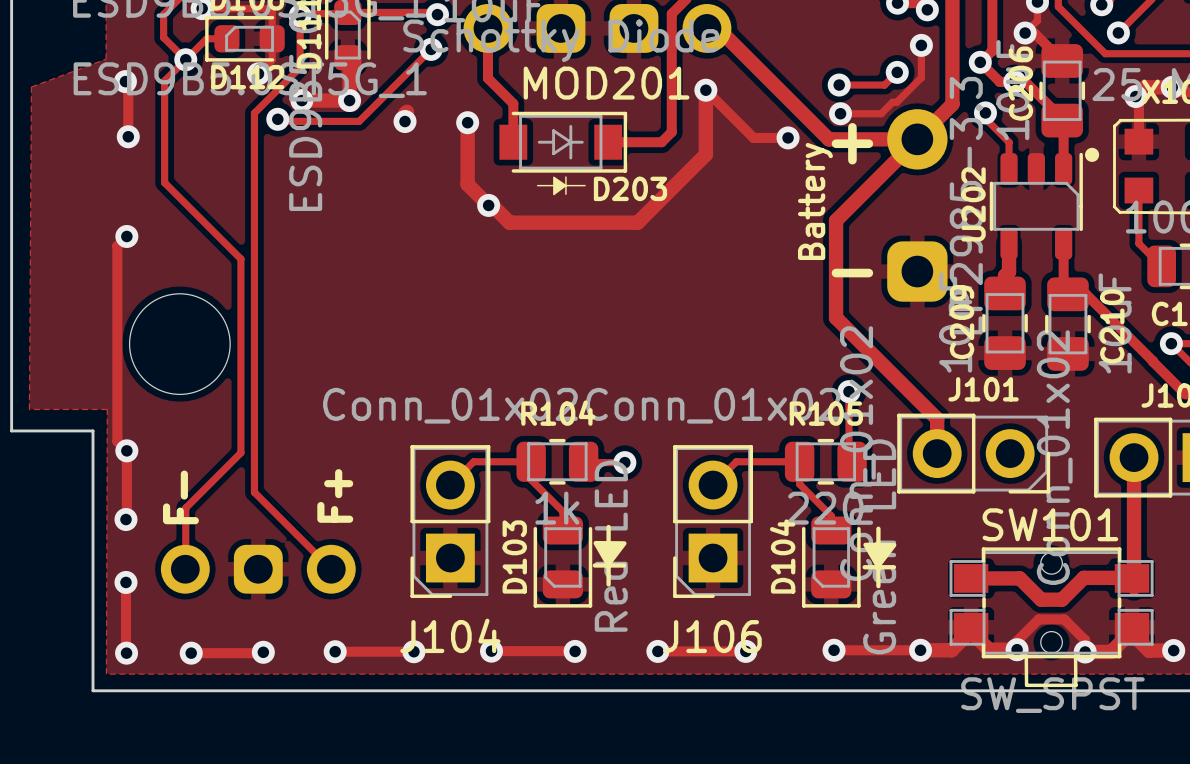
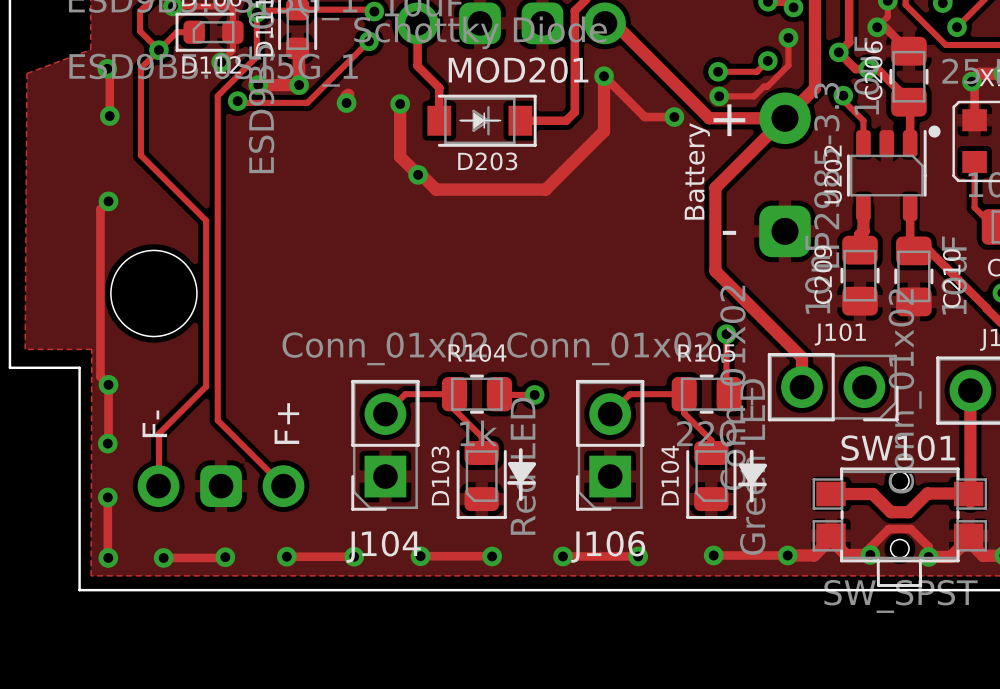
D203 footprint: [499, 111, 628, 196] -> [427, 94, 537, 147]
D203 name position: D203 (630, 188) -> D203 (487, 161)

